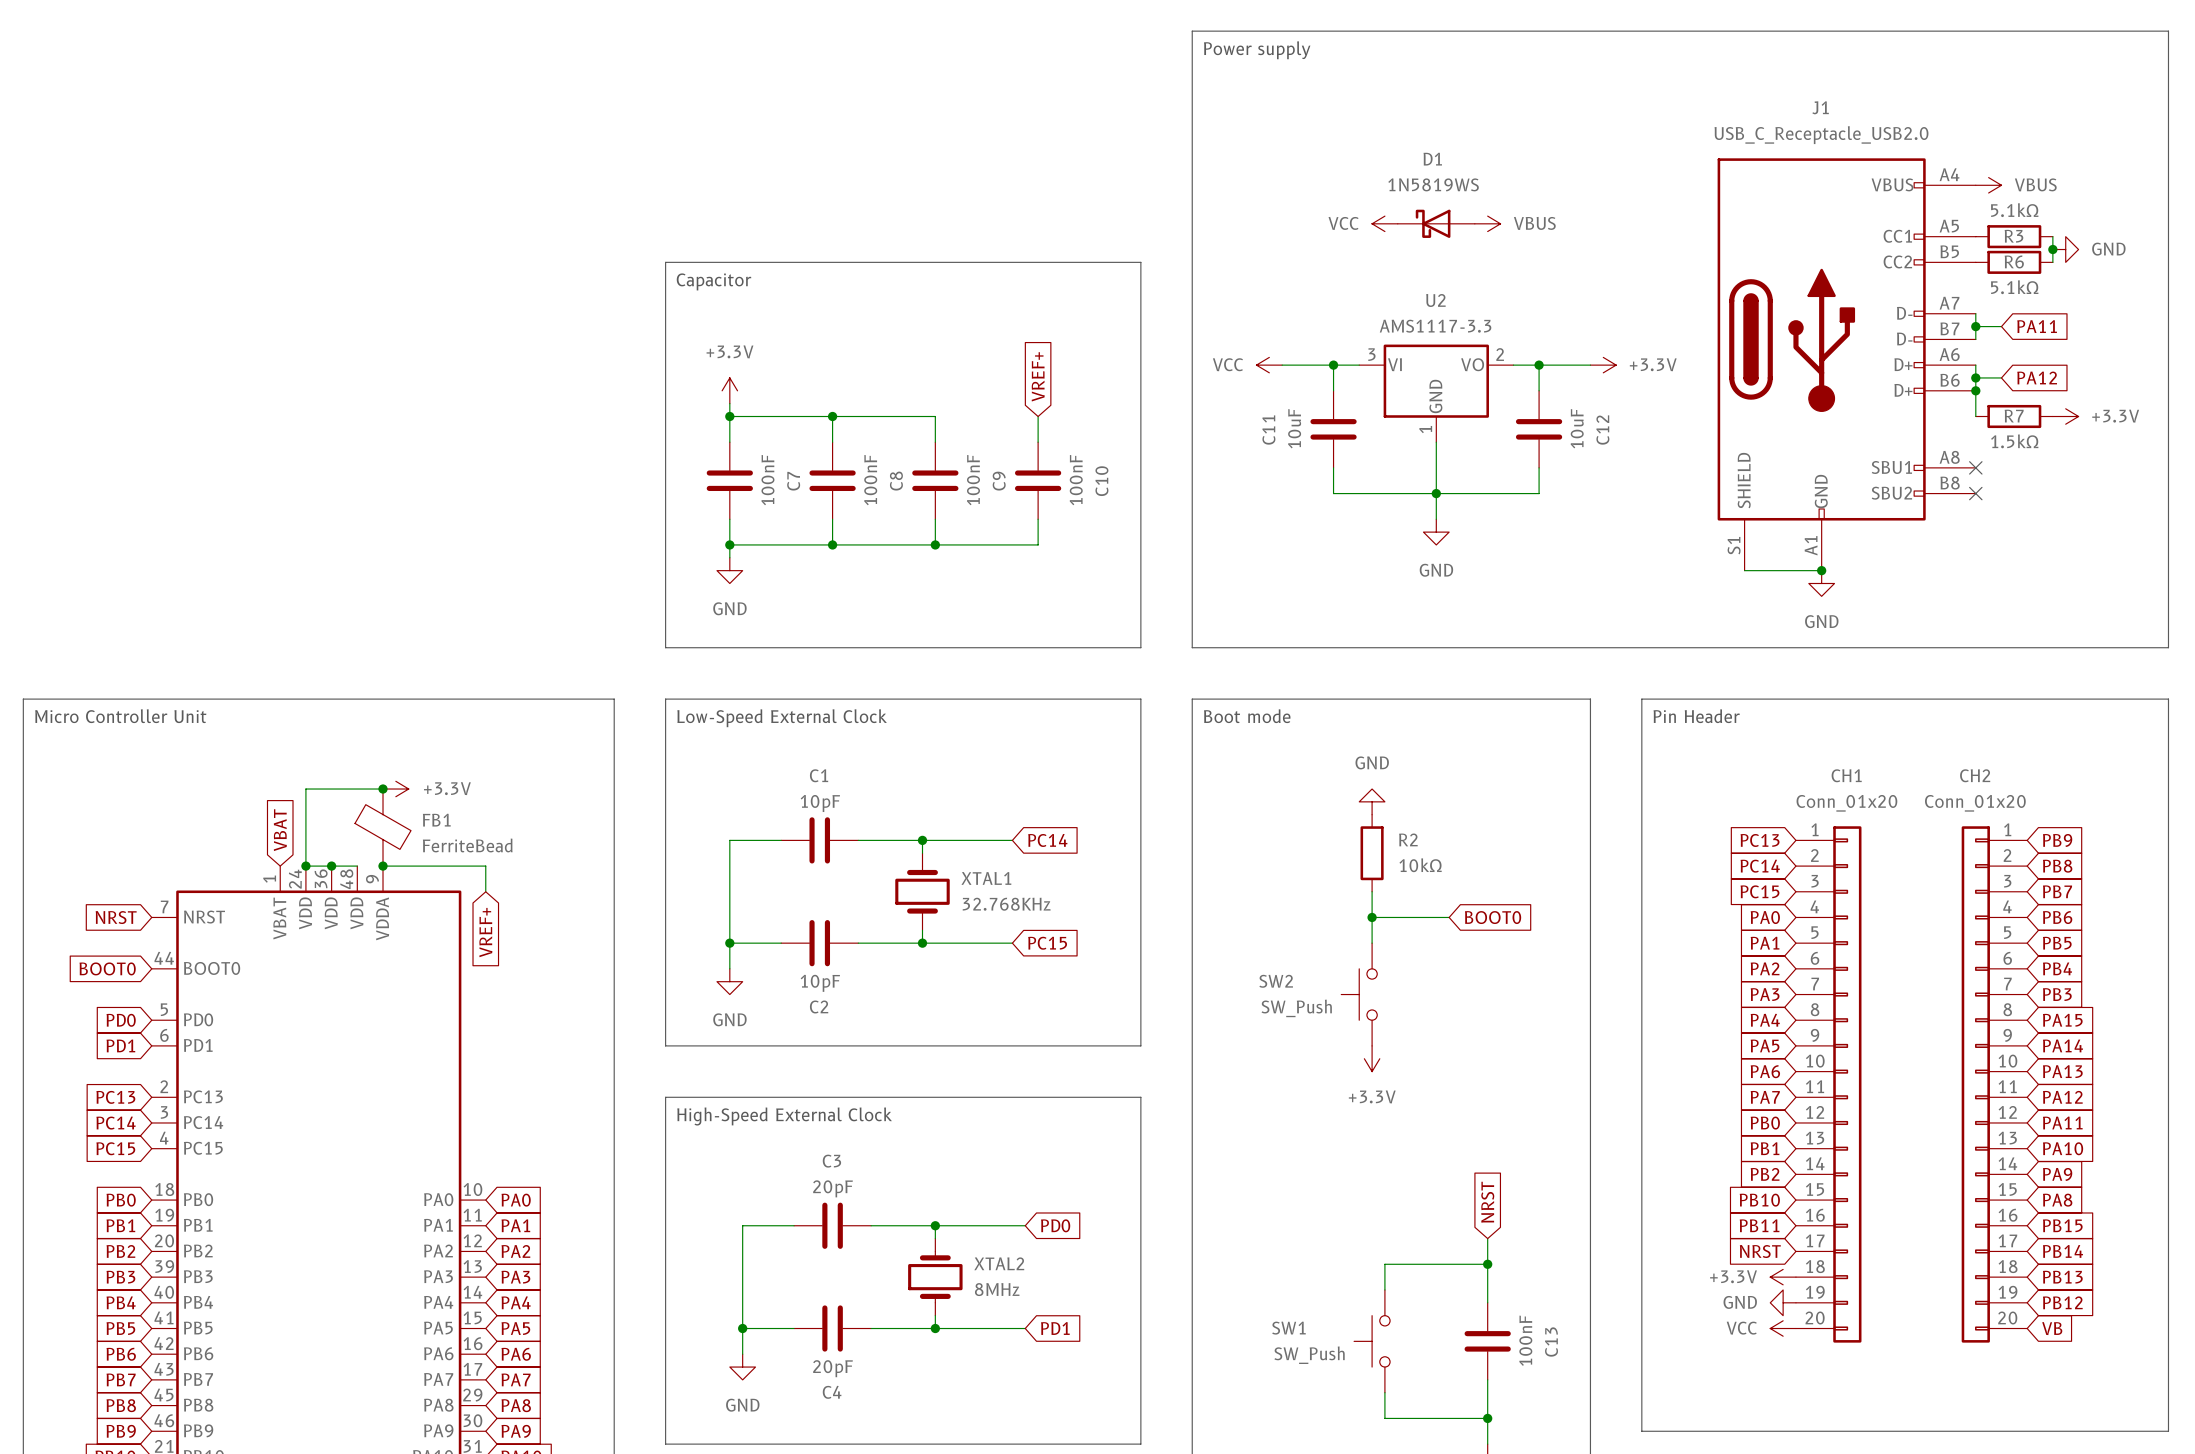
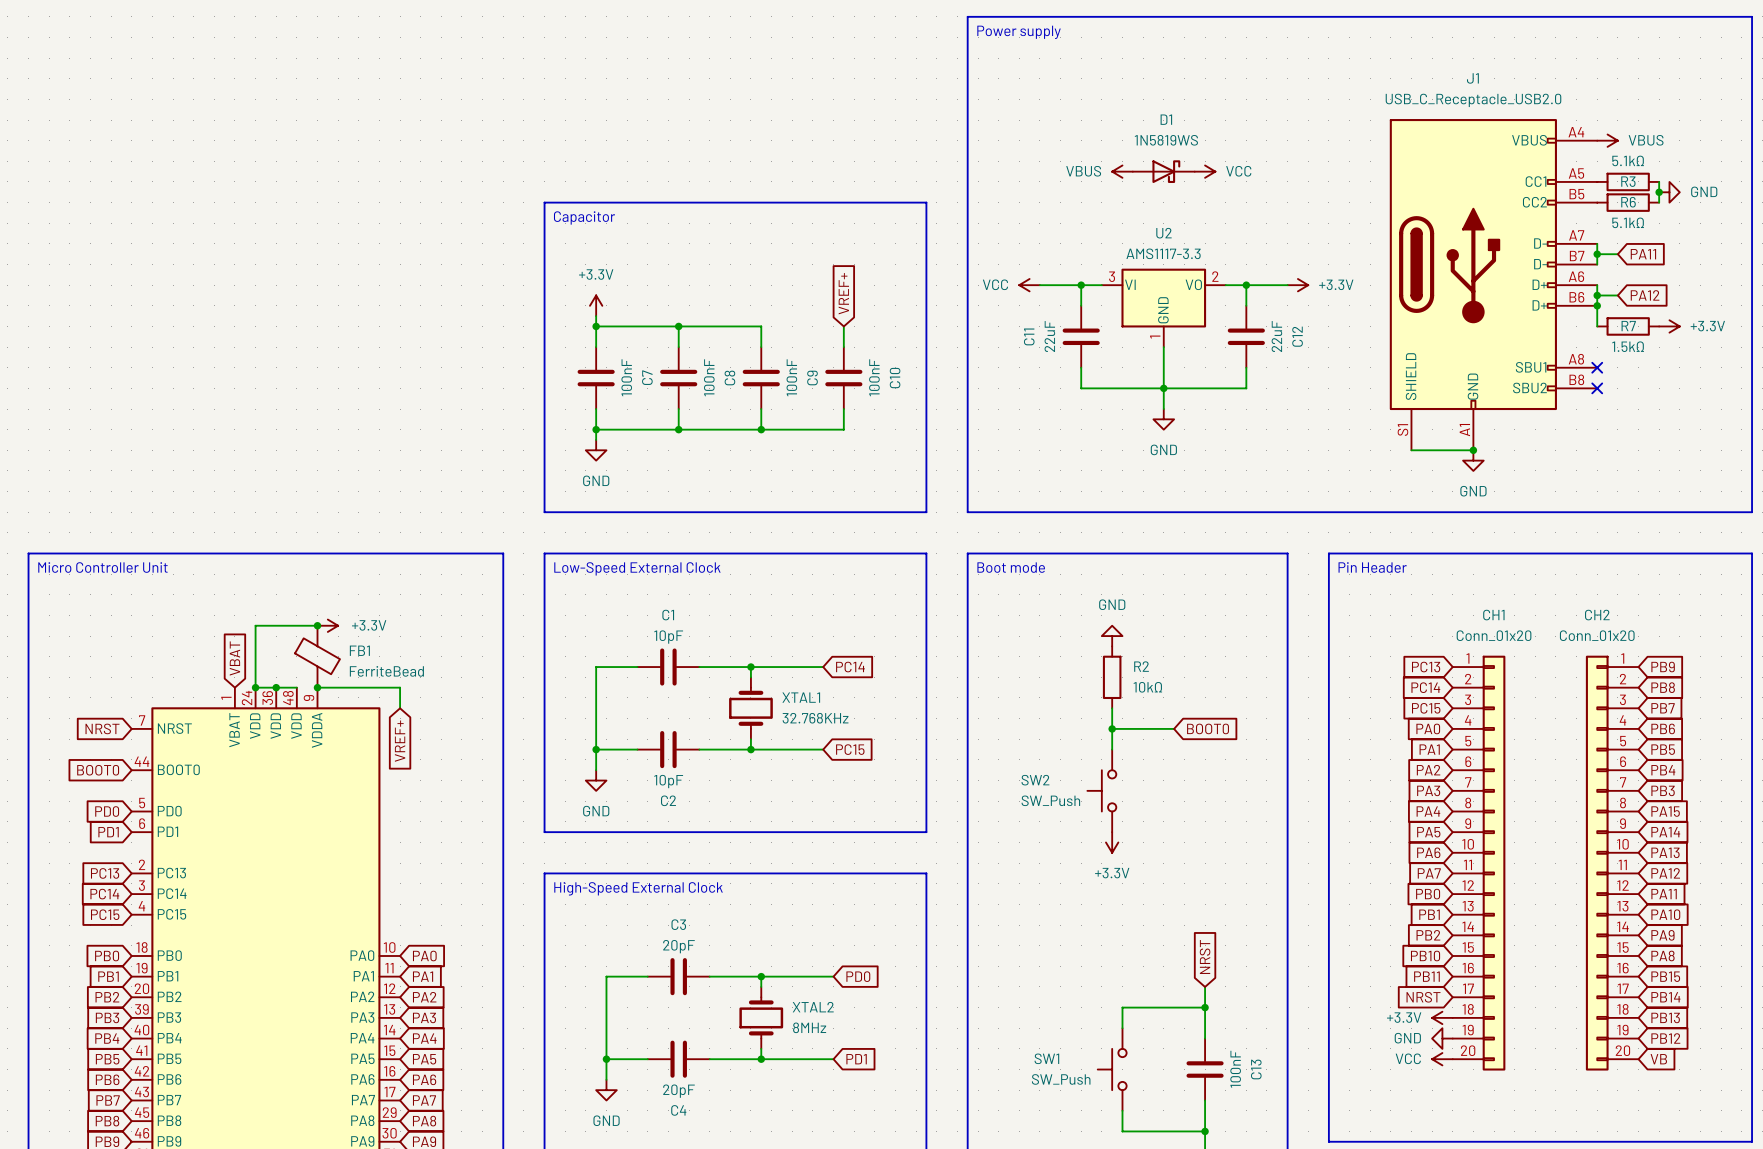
power symbol: VCC (1384, 223) -> VBUS (1122, 171)
D1 flip: as is (1433, 223) -> left-right (1166, 171)
power symbol: VBUS (1487, 223) -> VCC (1205, 171)
C11 value: 10uF (1294, 428) -> 22uF (1049, 336)
C12 value: 10uF (1577, 428) -> 22uF (1276, 336)

